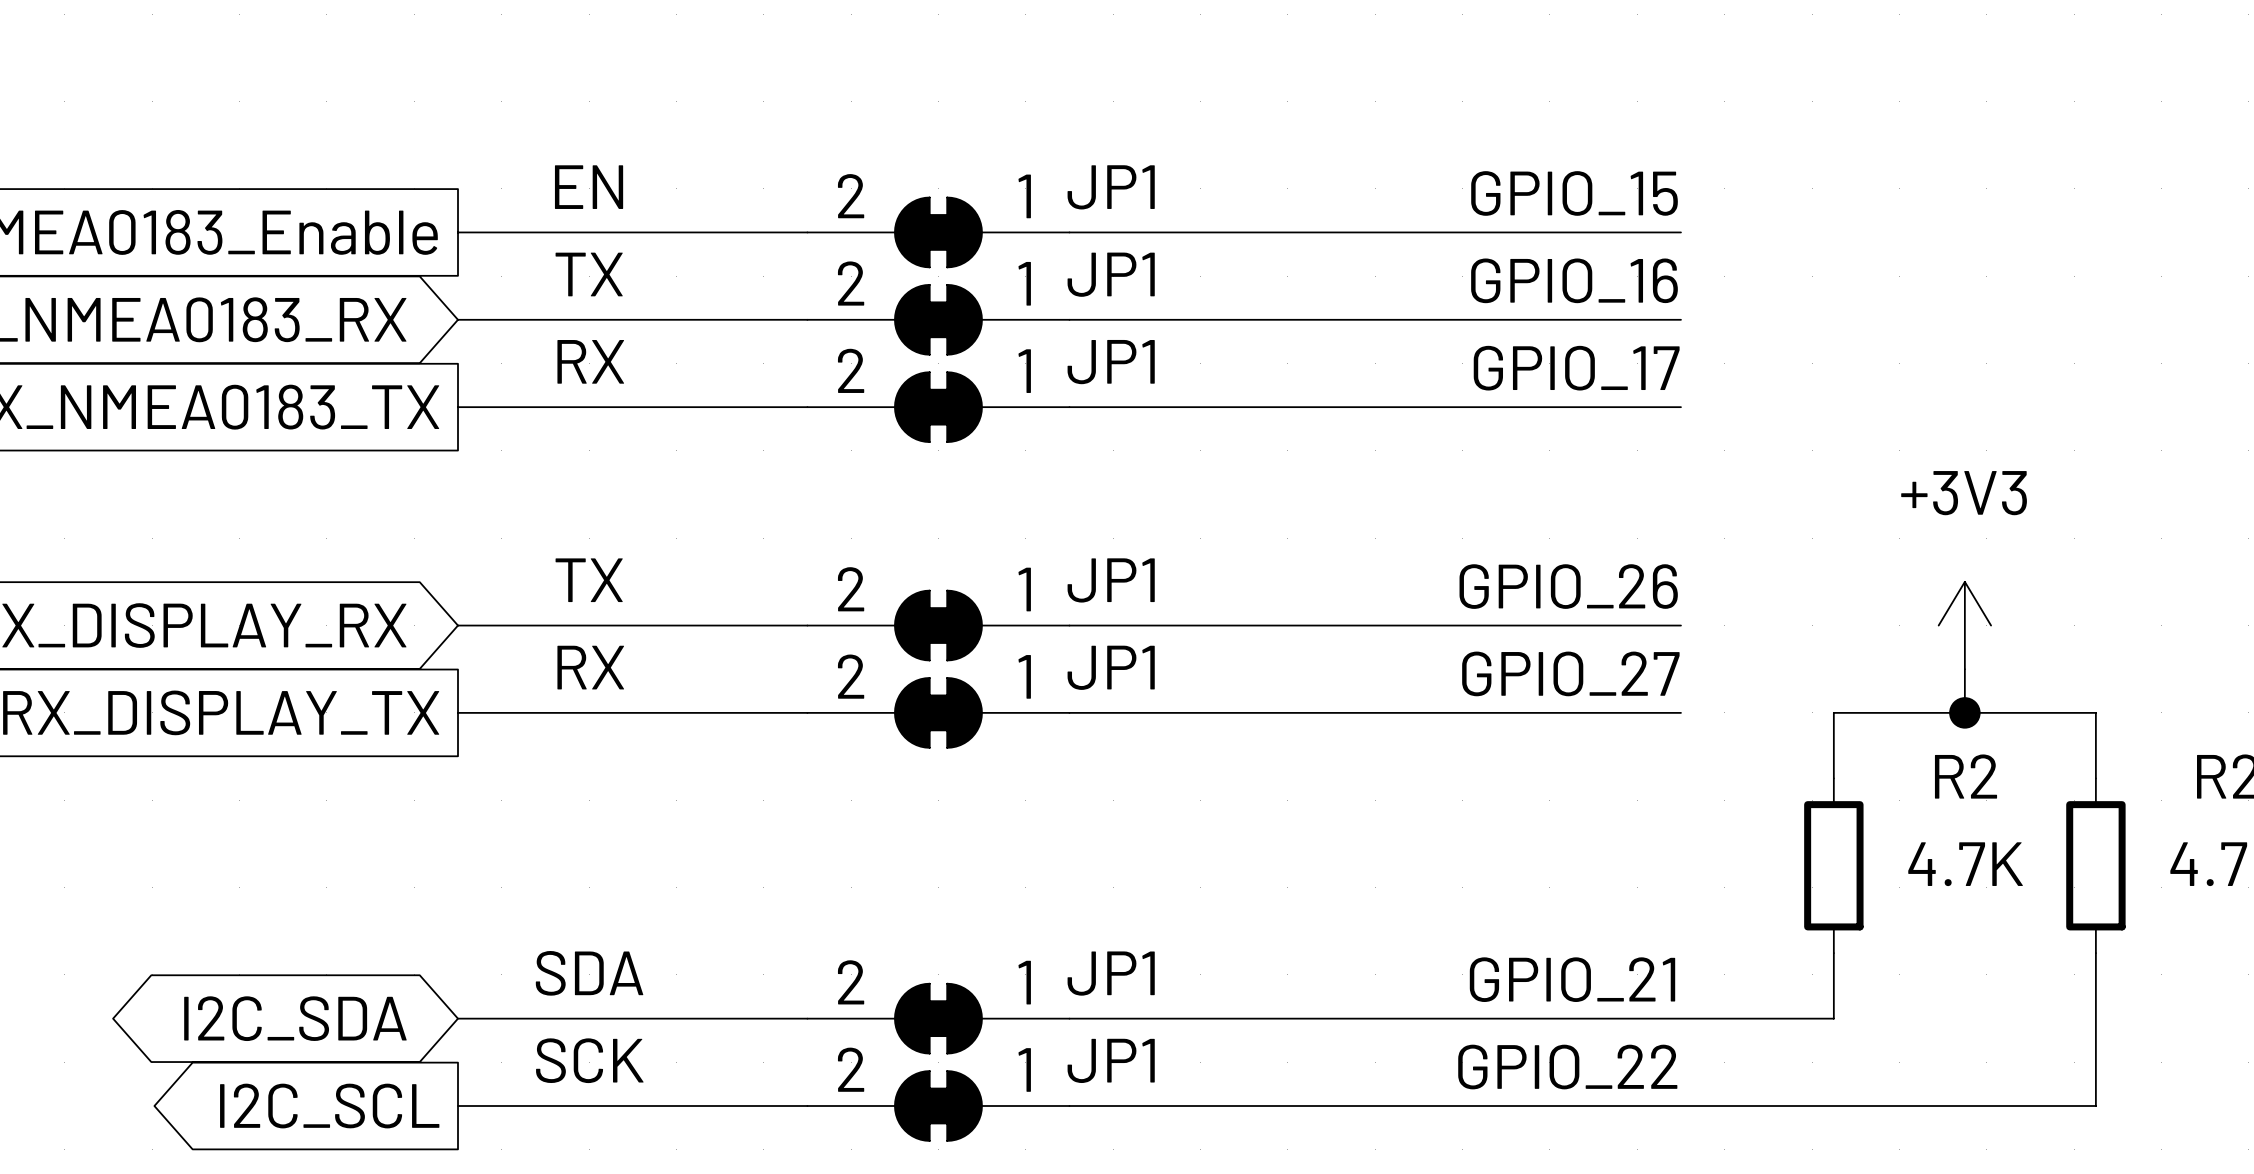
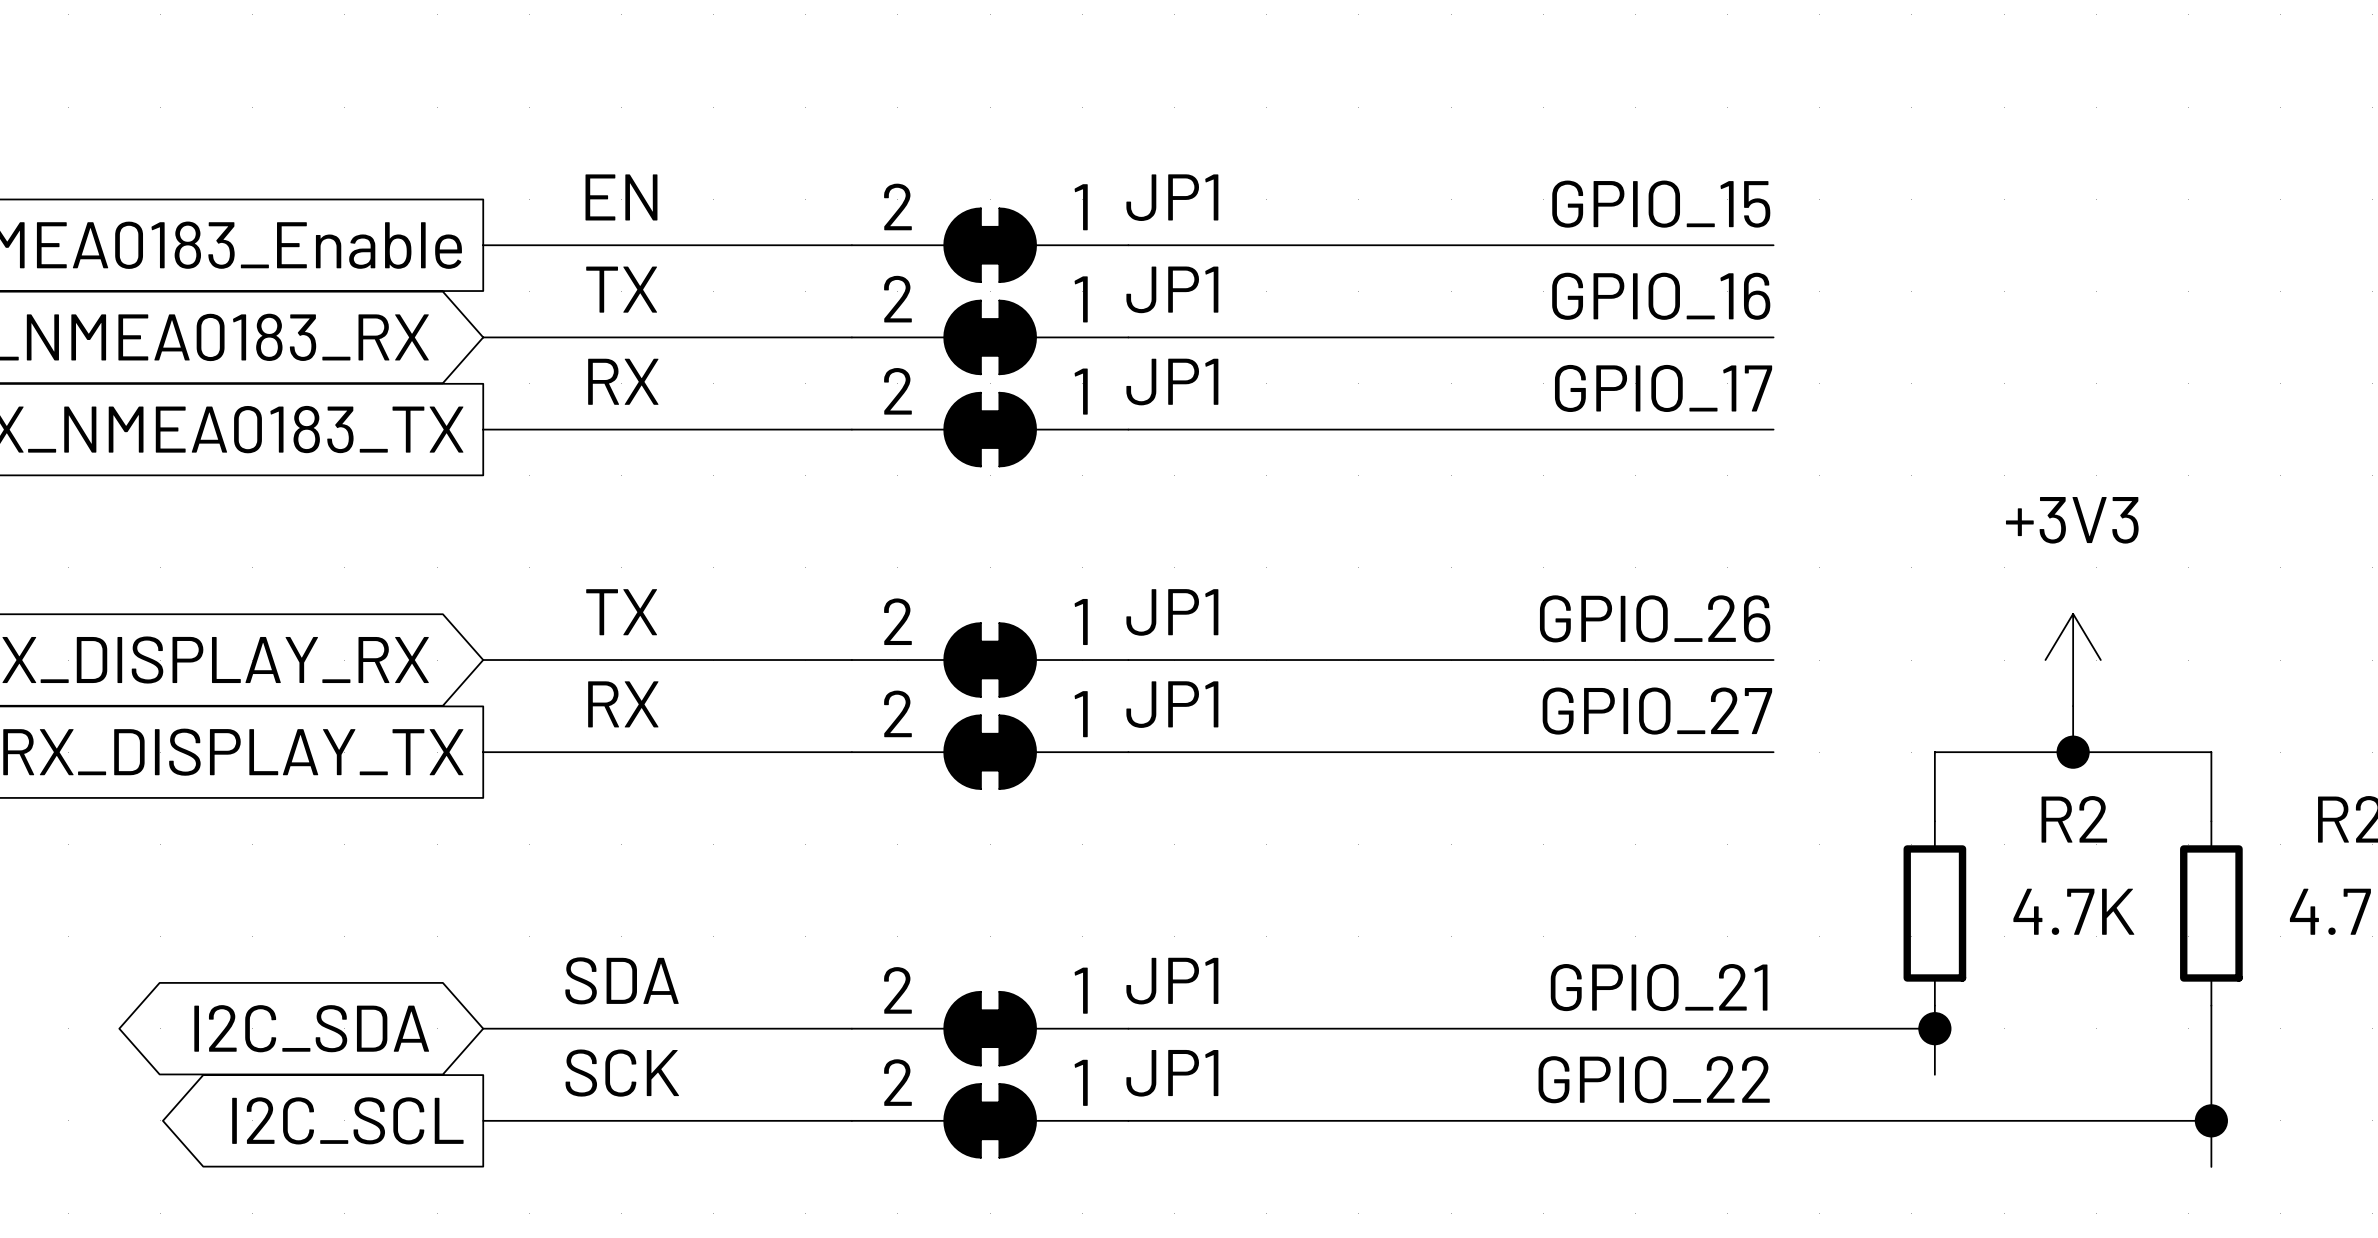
junction: none -> (1934, 1028)
label position: GPIO_21 (1572, 979) -> GPIO_21 (1659, 987)
global label position: I2C_SDA (295, 1018) -> I2C_SDA (311, 1028)
wire: (458, 1018) (807, 1018) -> (483, 1028) (851, 1028)
JP1 position: (938, 1018) -> (990, 1028)
wire: (1069, 1018) (1833, 1018) -> (1128, 1028) (1934, 1028)
junction: none -> (2211, 1120)
label position: GPIO_22 (1567, 1067) -> GPIO_22 (1654, 1079)
global label position: I2C_SCL (329, 1106) -> I2C_SCL (347, 1120)
wire: (458, 1106) (807, 1106) -> (483, 1120) (851, 1120)
JP1 position: (938, 1106) -> (990, 1120)
wire: (1069, 1106) (2095, 1106) -> (1128, 1120) (2211, 1120)

